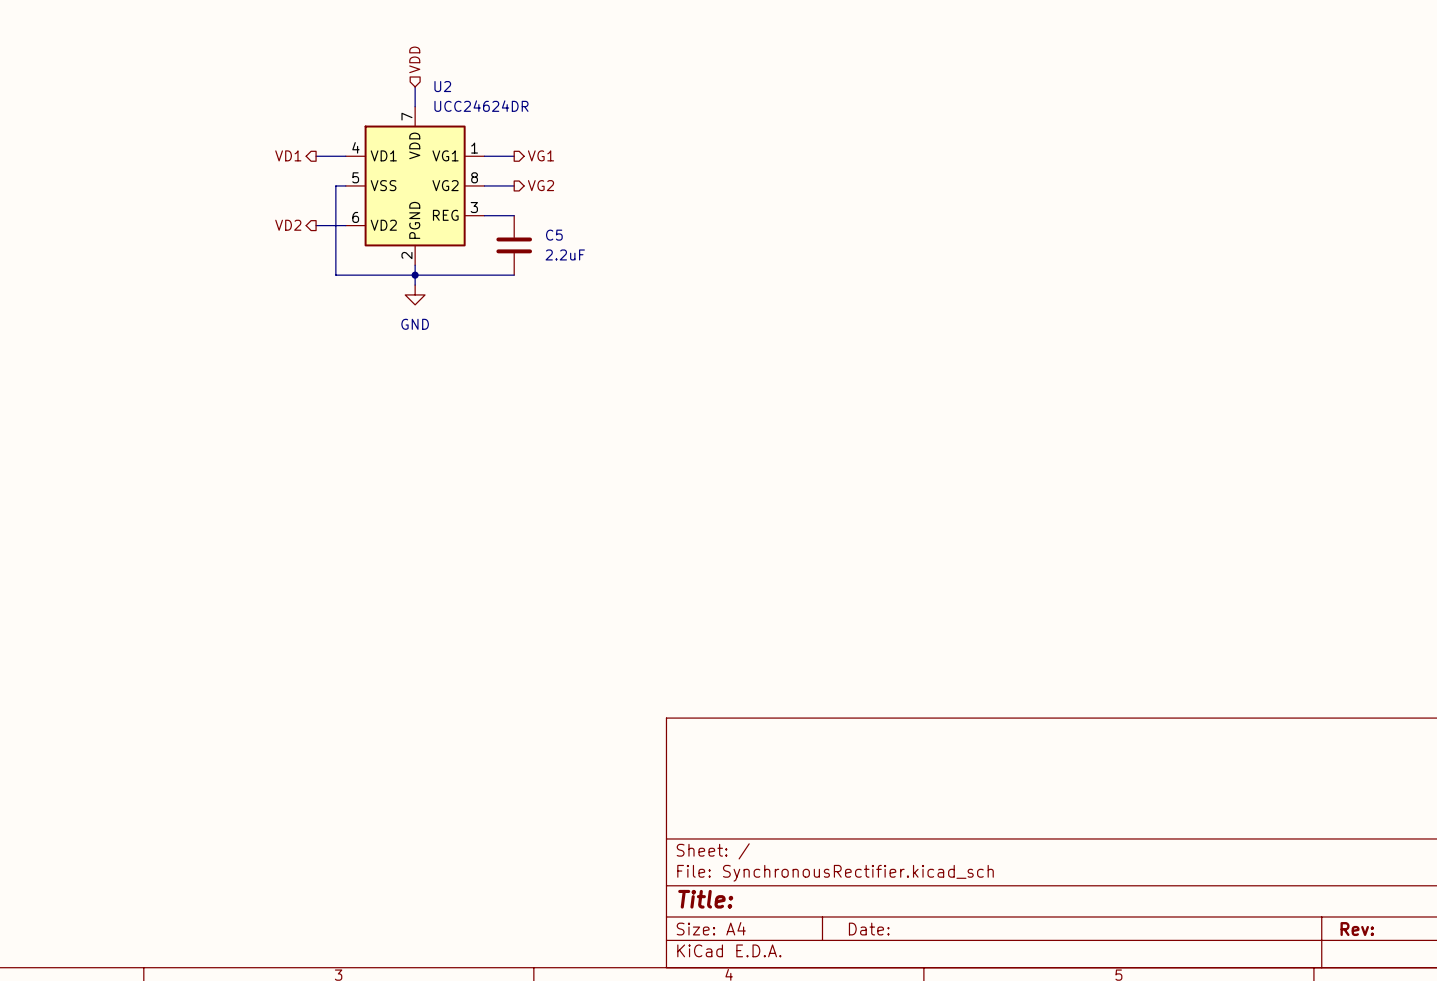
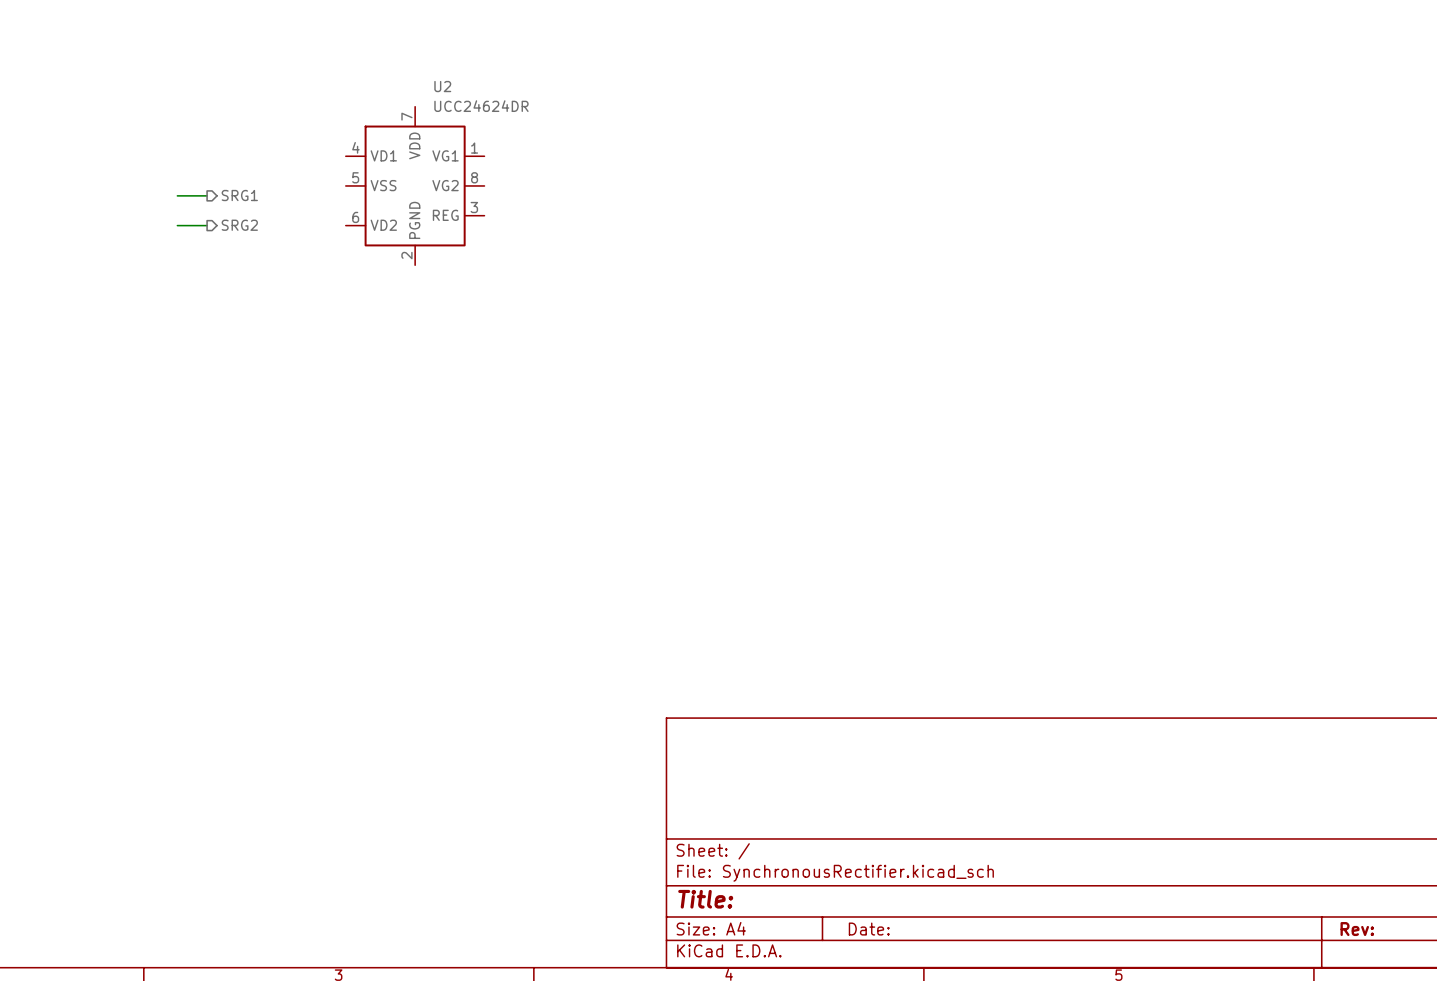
hierarchical label: VDD (414, 59) -> none
wire: (415, 86) (415, 106) -> none
hierarchical label: VD1 (288, 155) -> none
hierarchical label: VG1 (541, 155) -> none
wire: (316, 156) (345, 156) -> (177, 195) (207, 195)
wire: (484, 156) (514, 156) -> none
wire: (345, 185) (335, 185) (335, 275) (514, 275) -> none
wire: (484, 185) (514, 185) -> none
hierarchical label: VG2 (541, 185) -> none
hierarchical label: none -> SRG1 (239, 195)
wire: (484, 215) (514, 215) -> none
hierarchical label: none -> SRG2 (239, 225)
hierarchical label: VD2 (288, 225) -> none
wire: (316, 225) (345, 225) -> (177, 225) (207, 225)
C5: 2.2uF (514, 245) -> none
wire: (415, 265) (415, 285) -> none
junction: (415, 275) -> none
power symbol: GND (415, 294) -> none

